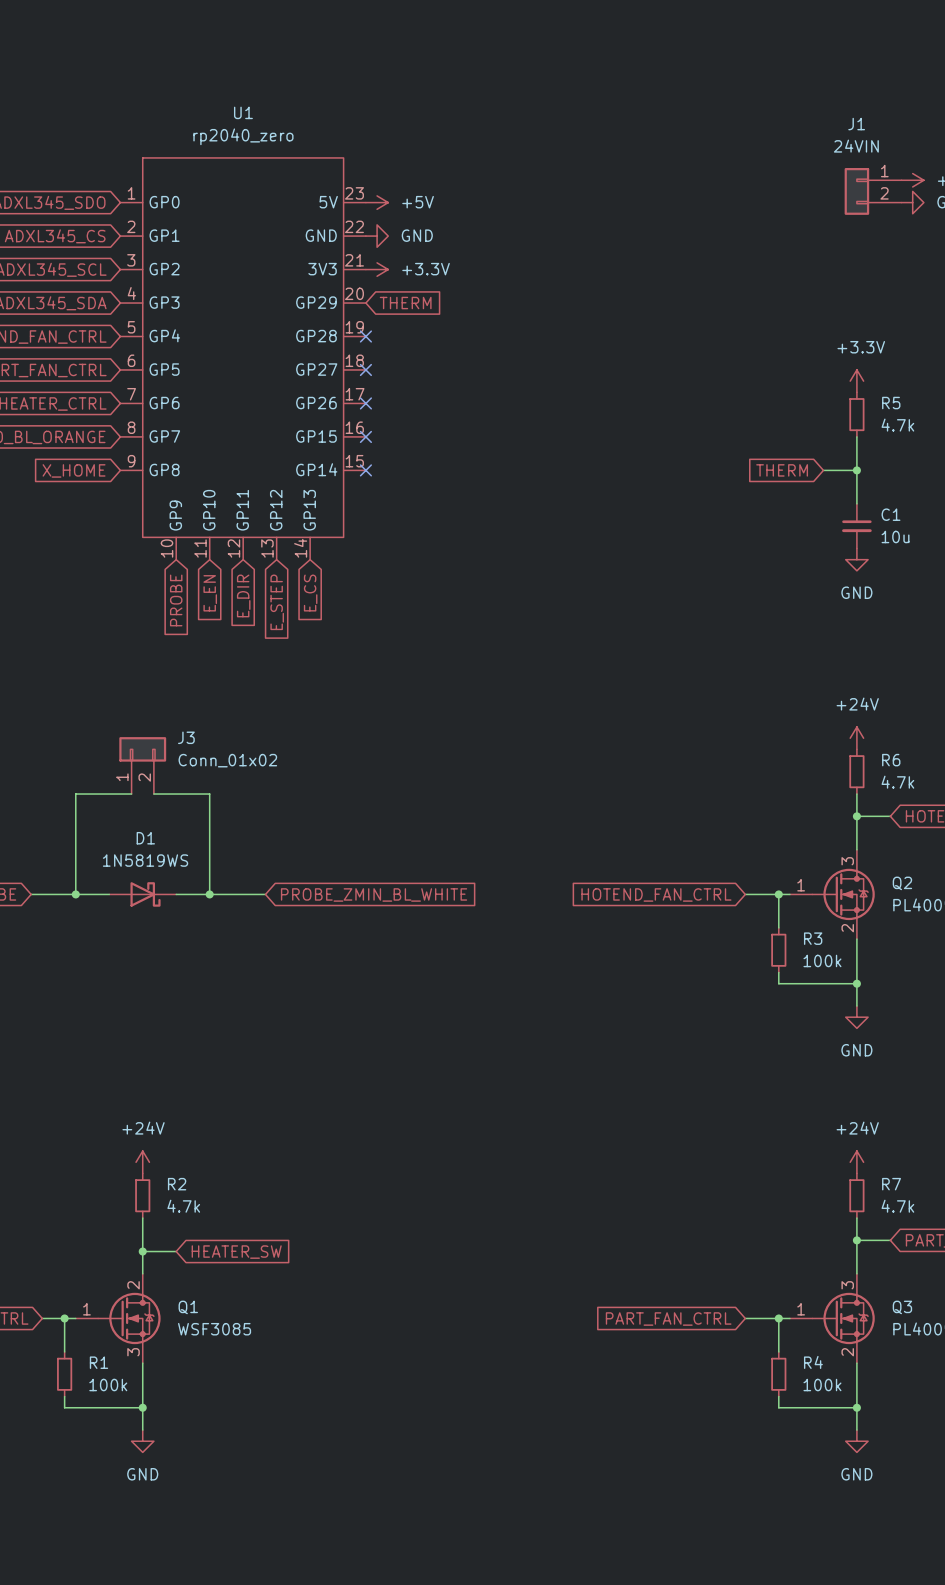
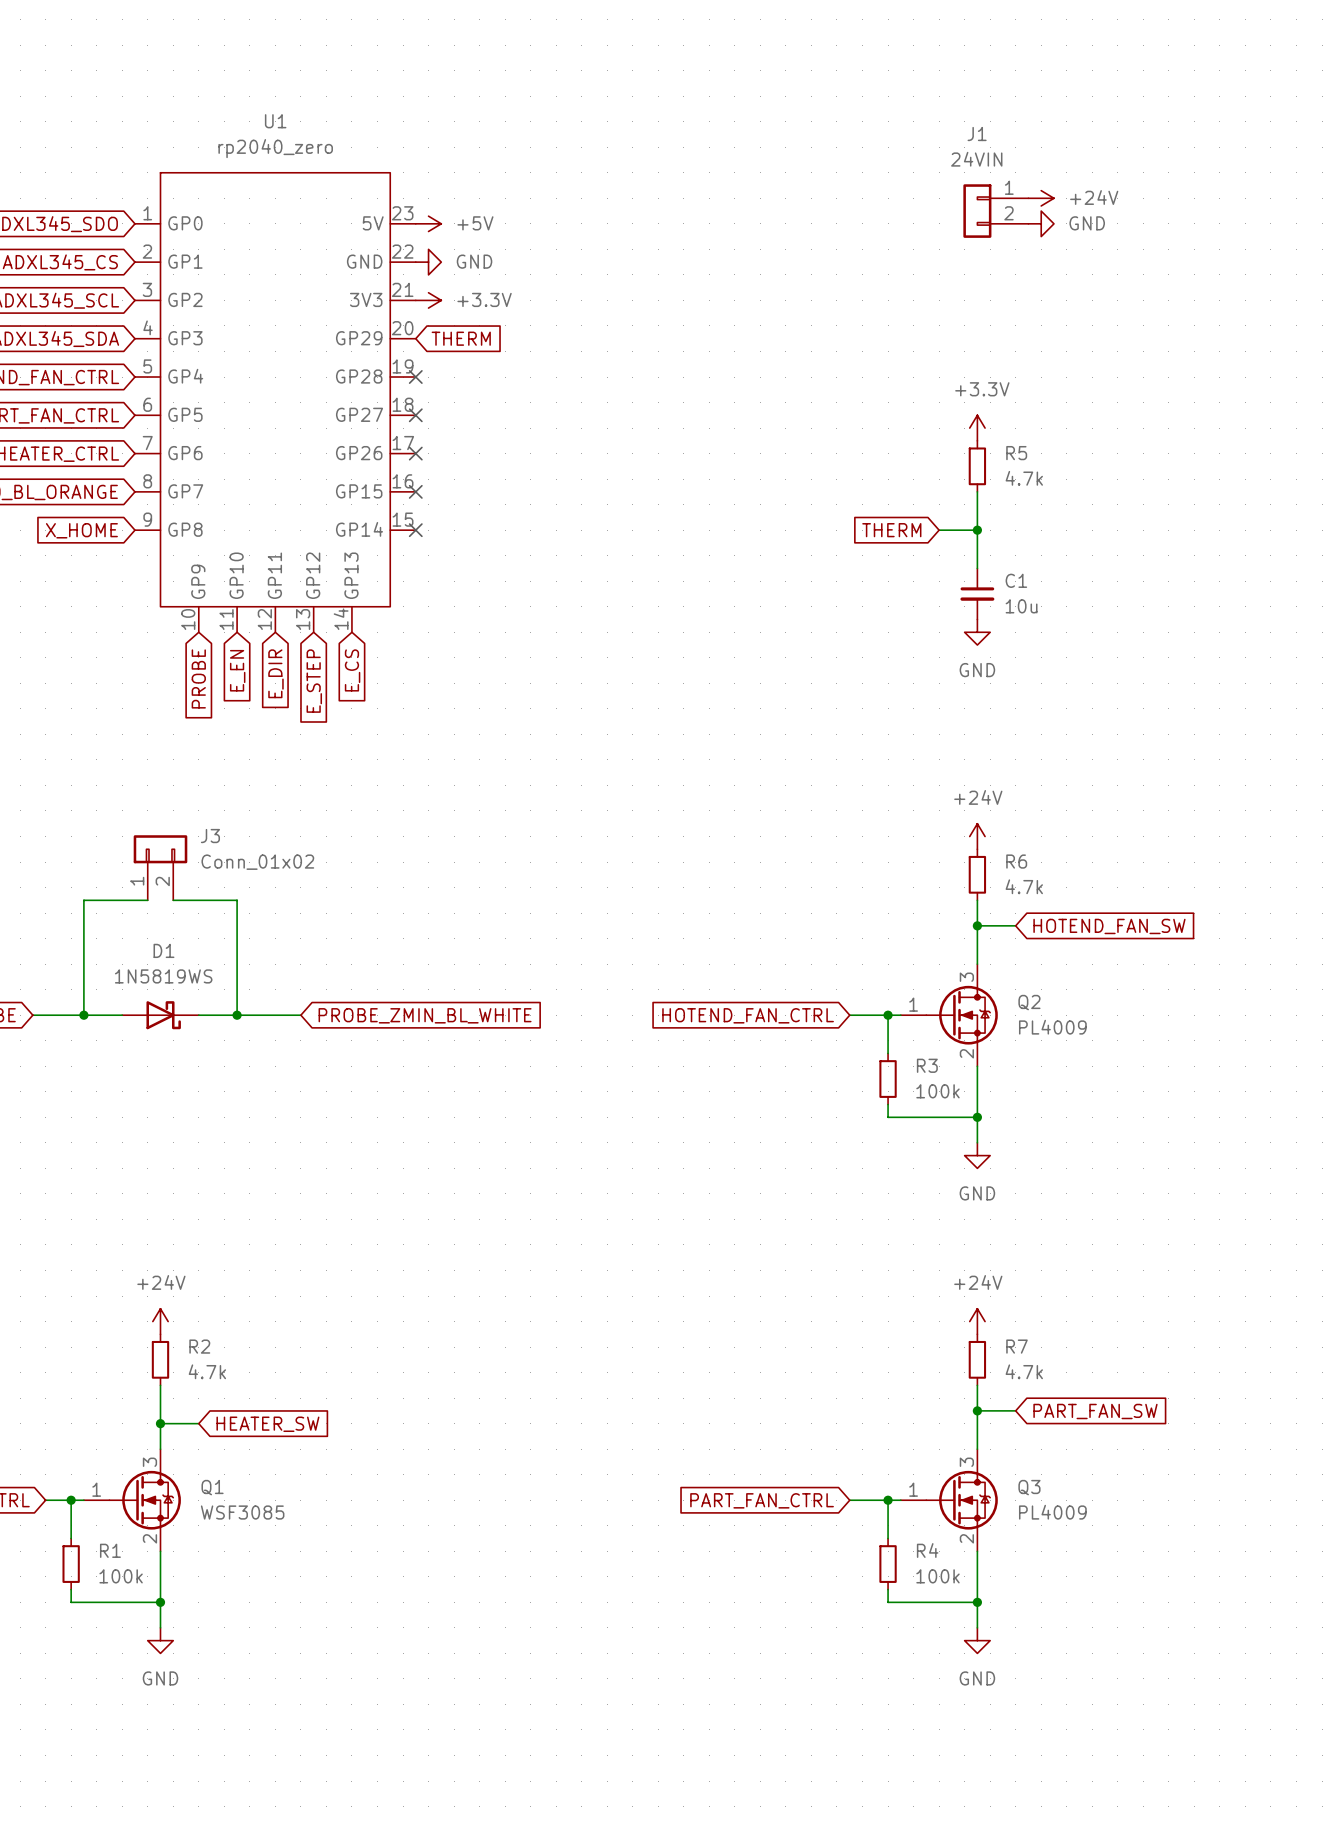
Q1 pin number: 2 (133, 1285) -> 3 (149, 1462)
Q1 pin number: 3 (133, 1352) -> 2 (149, 1538)

